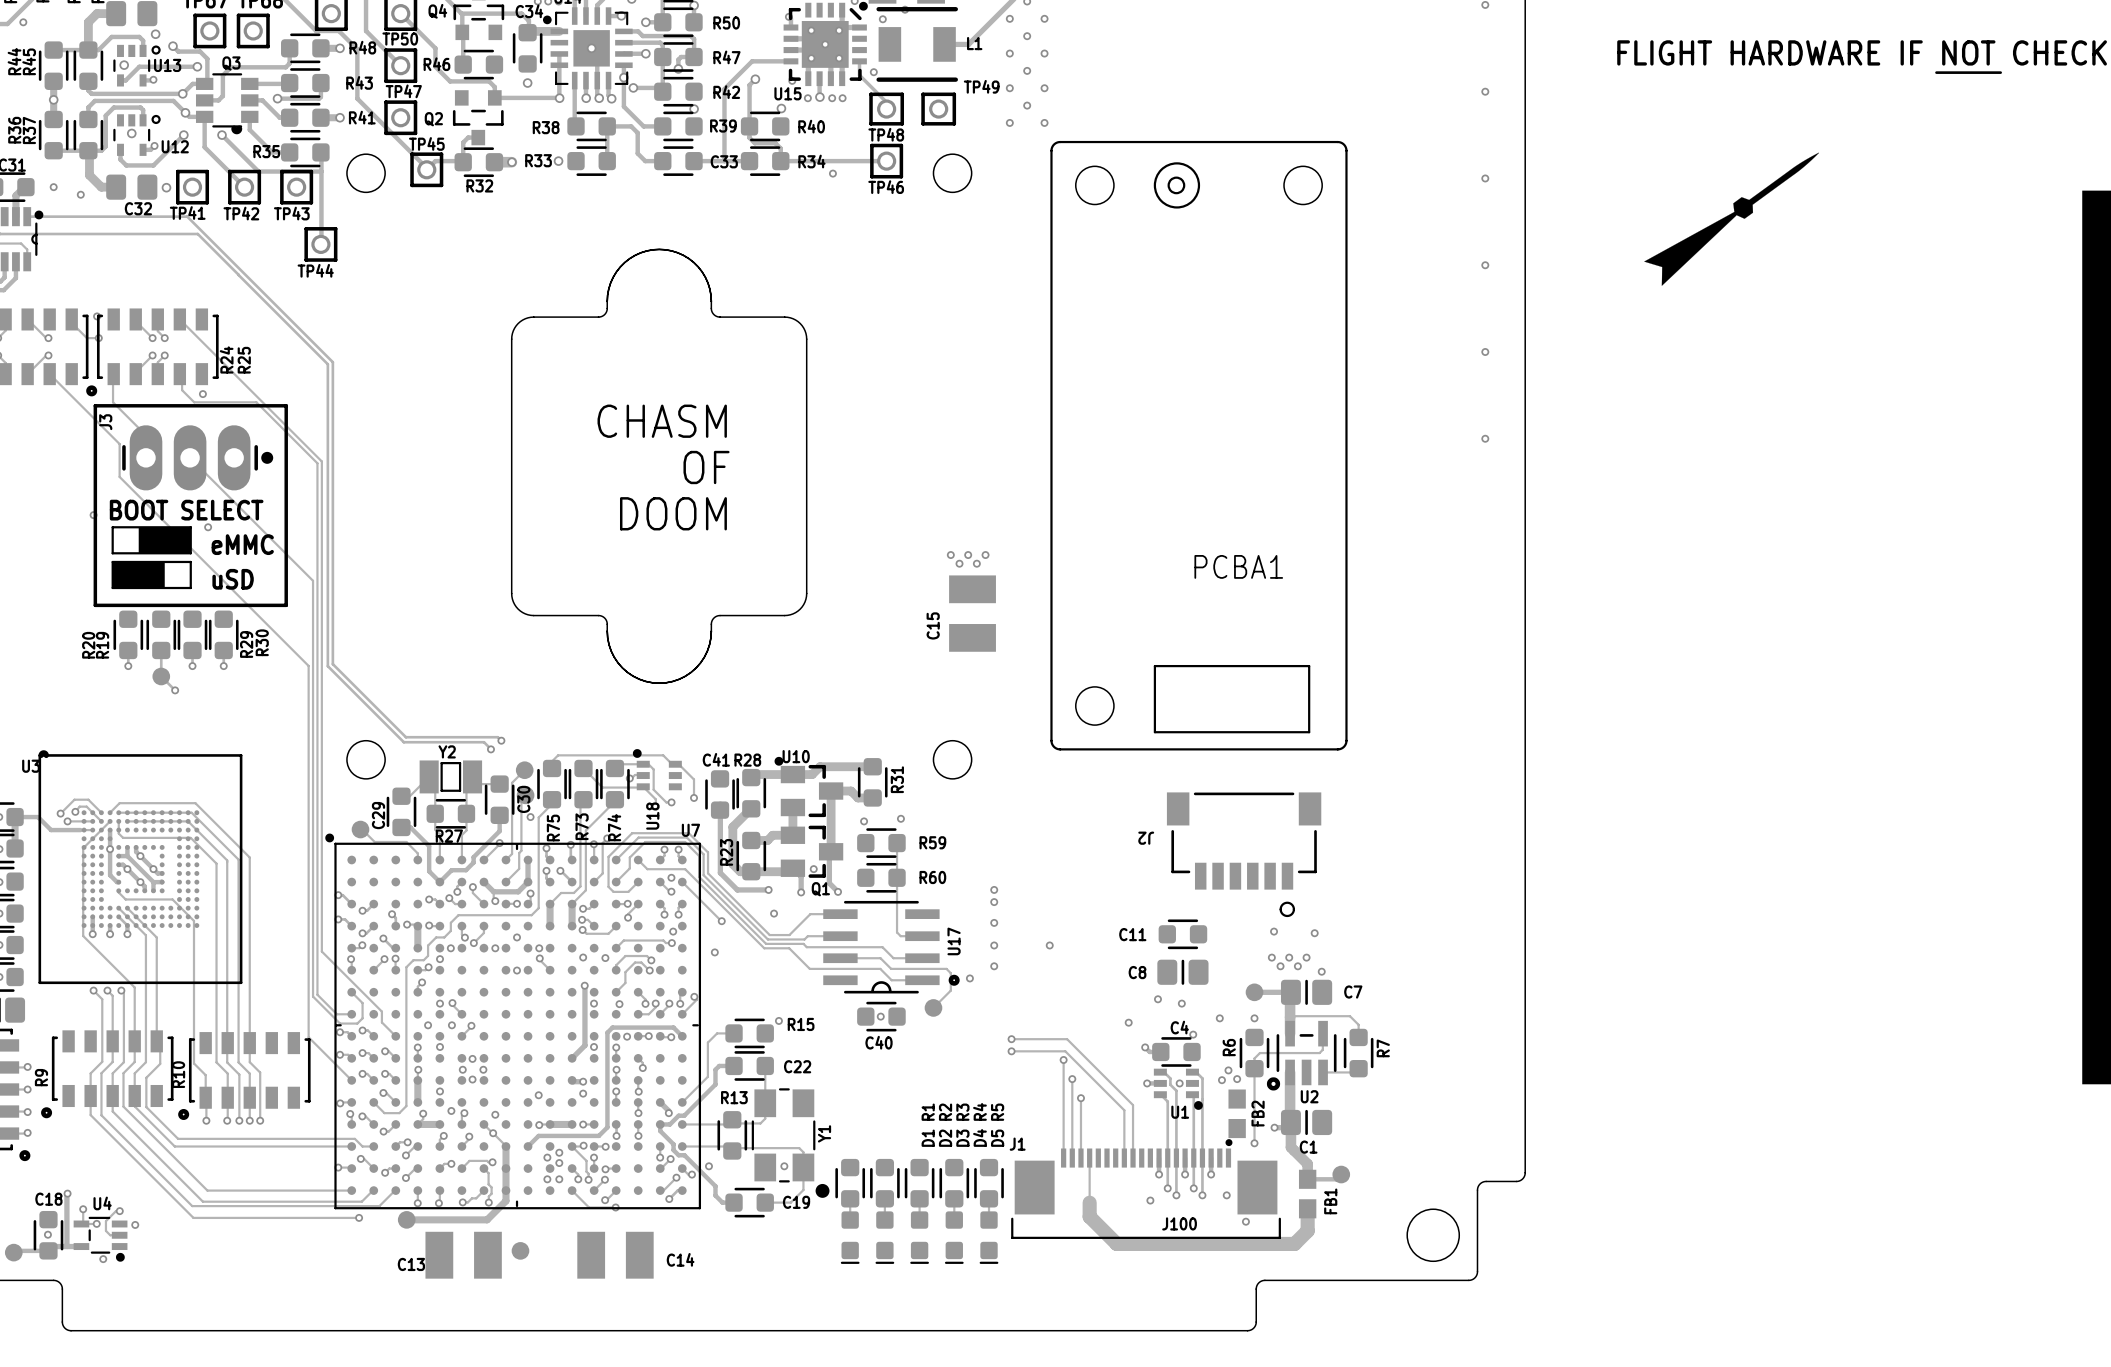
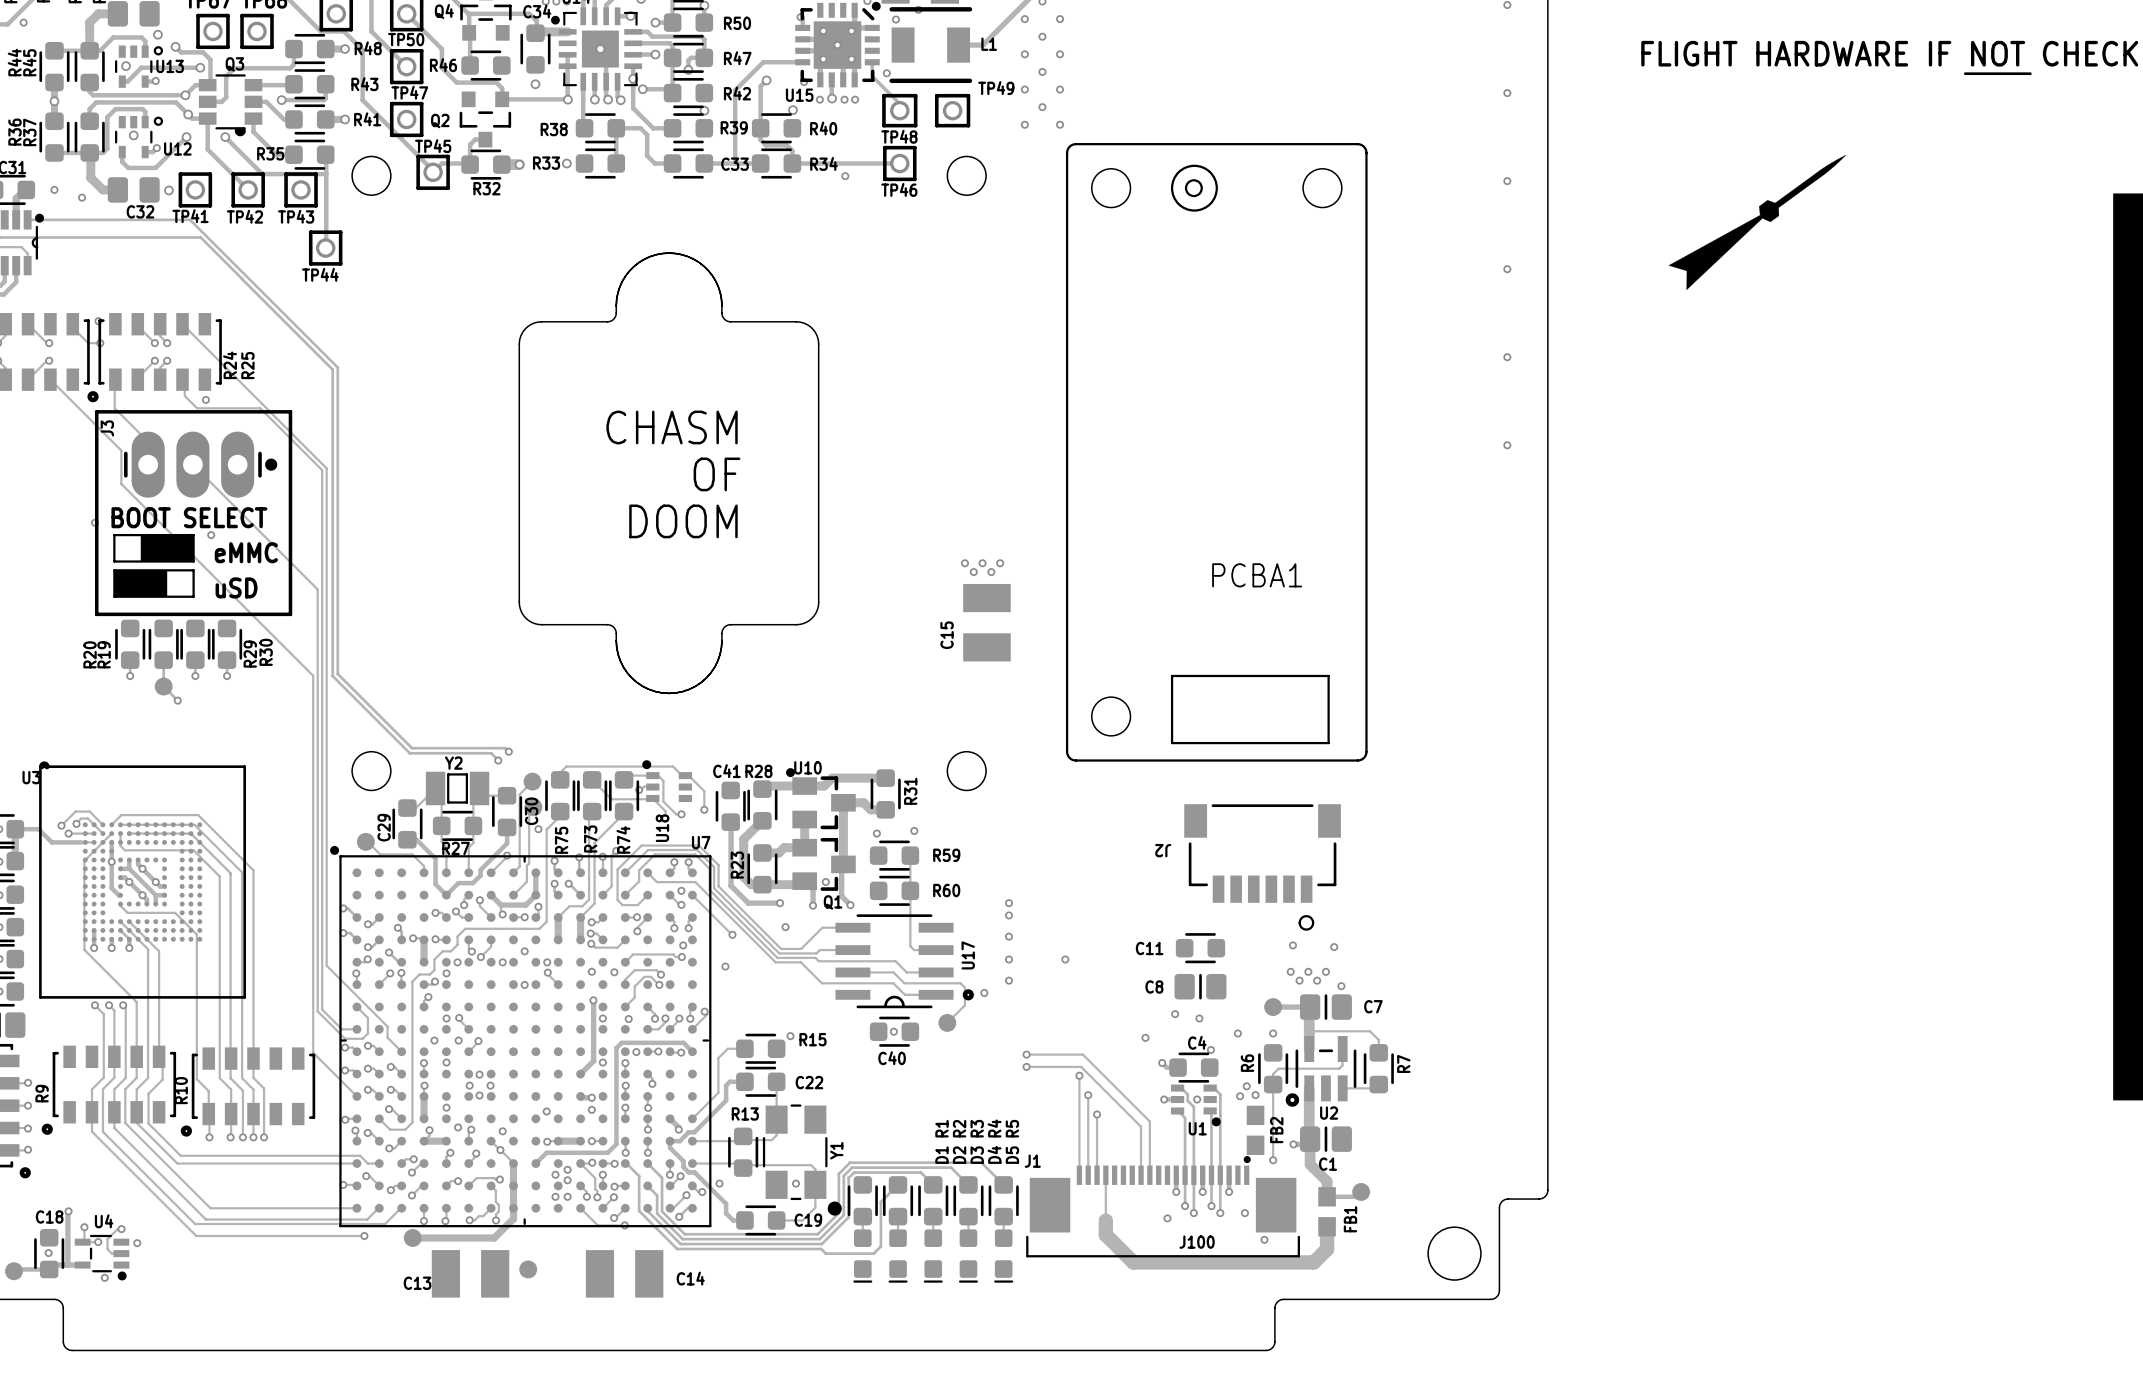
track: none -> (625, 1163) (639, 1176) (639, 1211) (677, 1249) (821, 1249) (825, 1253) (873, 1253) (880, 1246) (880, 1202) (898, 1184)
track: none -> (647, 1163) (662, 1177) (662, 1211) (684, 1234) (817, 1234) (838, 1213) (838, 1173) (850, 1162) (981, 1162) (1003, 1184)
track: none -> (933, 1184) (920, 1172) (854, 1172) (848, 1177) (848, 1217) (821, 1244) (680, 1244) (648, 1212) (647, 1208)
track: none -> (968, 1184) (951, 1167) (852, 1167) (843, 1175) (843, 1215) (819, 1239) (682, 1239) (657, 1213) (657, 1195) (647, 1186)

